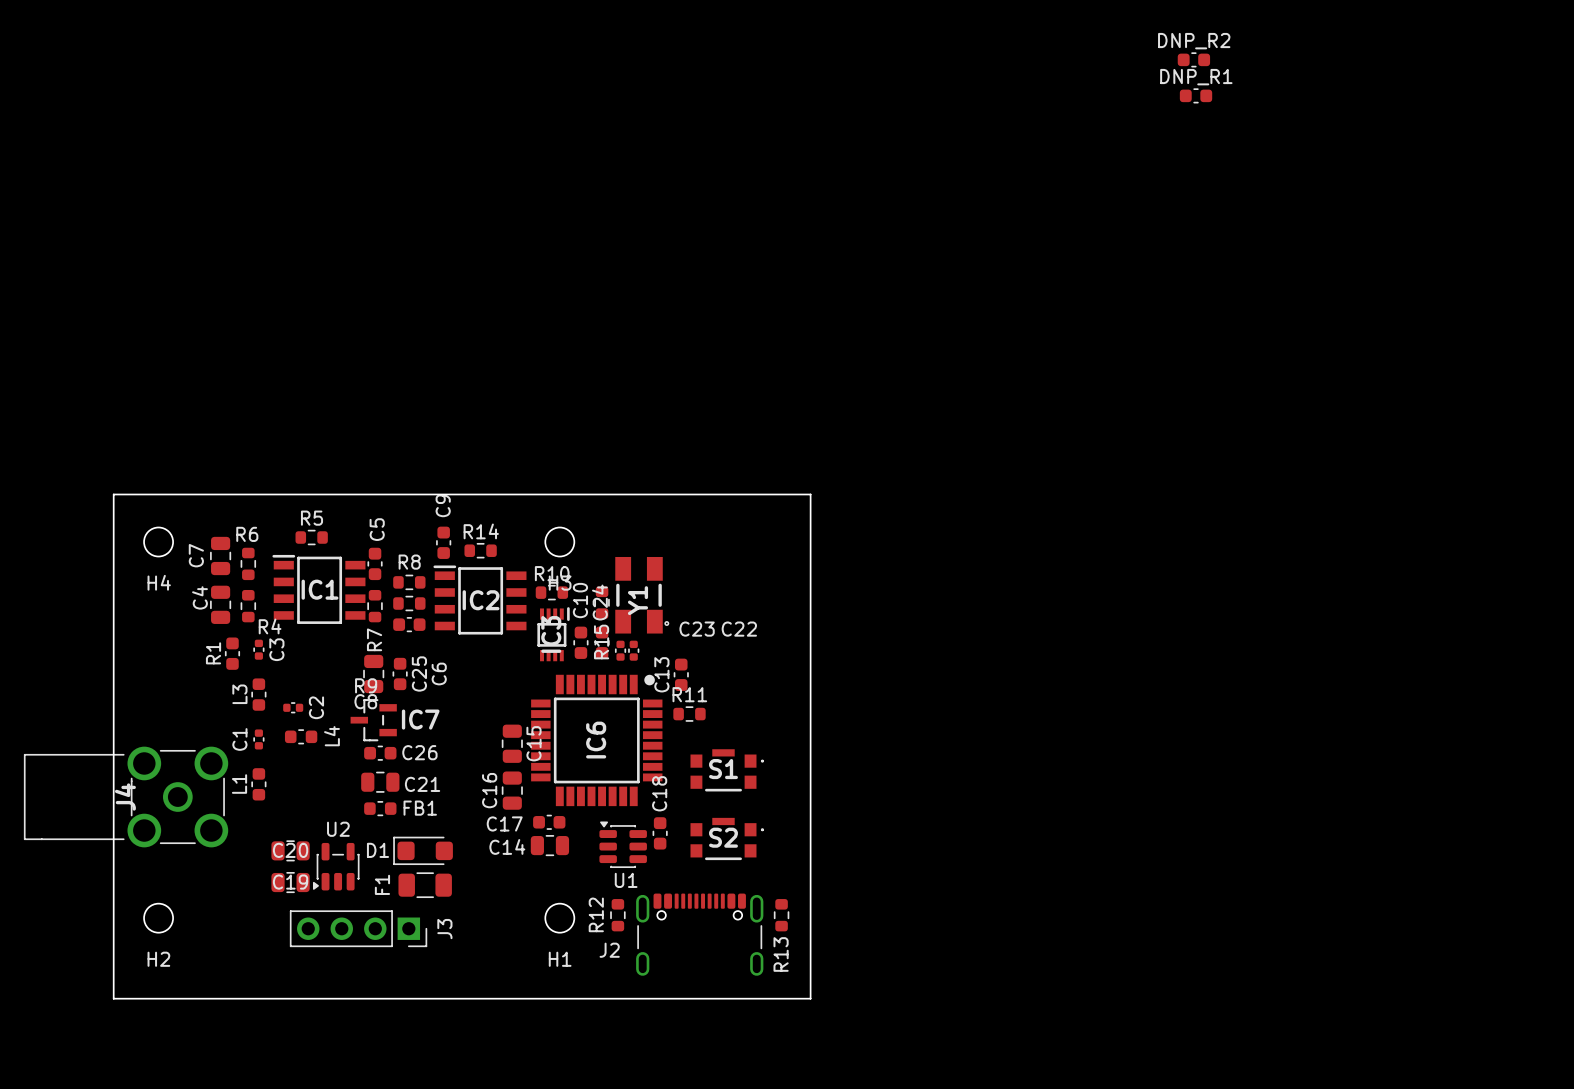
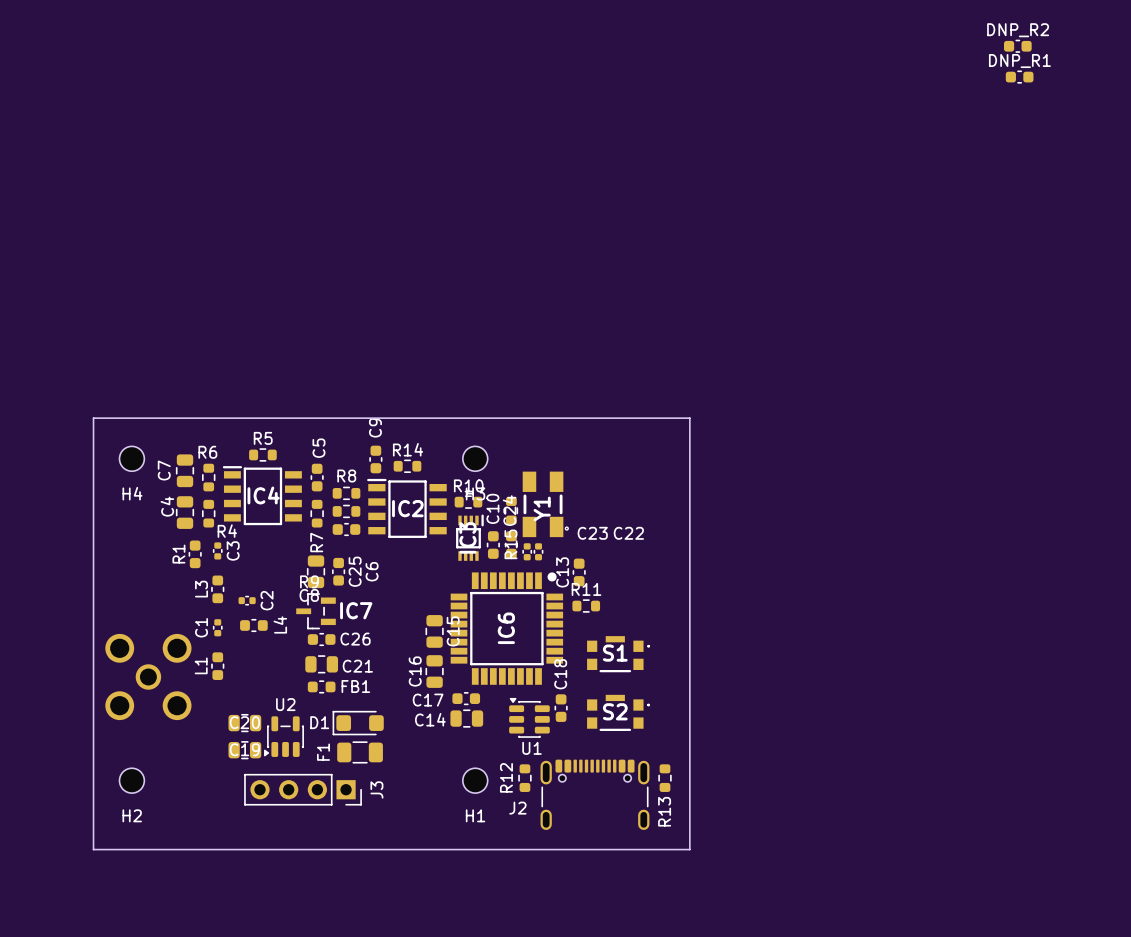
IC4: none -> (262, 495)
IC1: (318, 589) -> none
J4 side: top (126, 797) -> bottom (148, 677)

